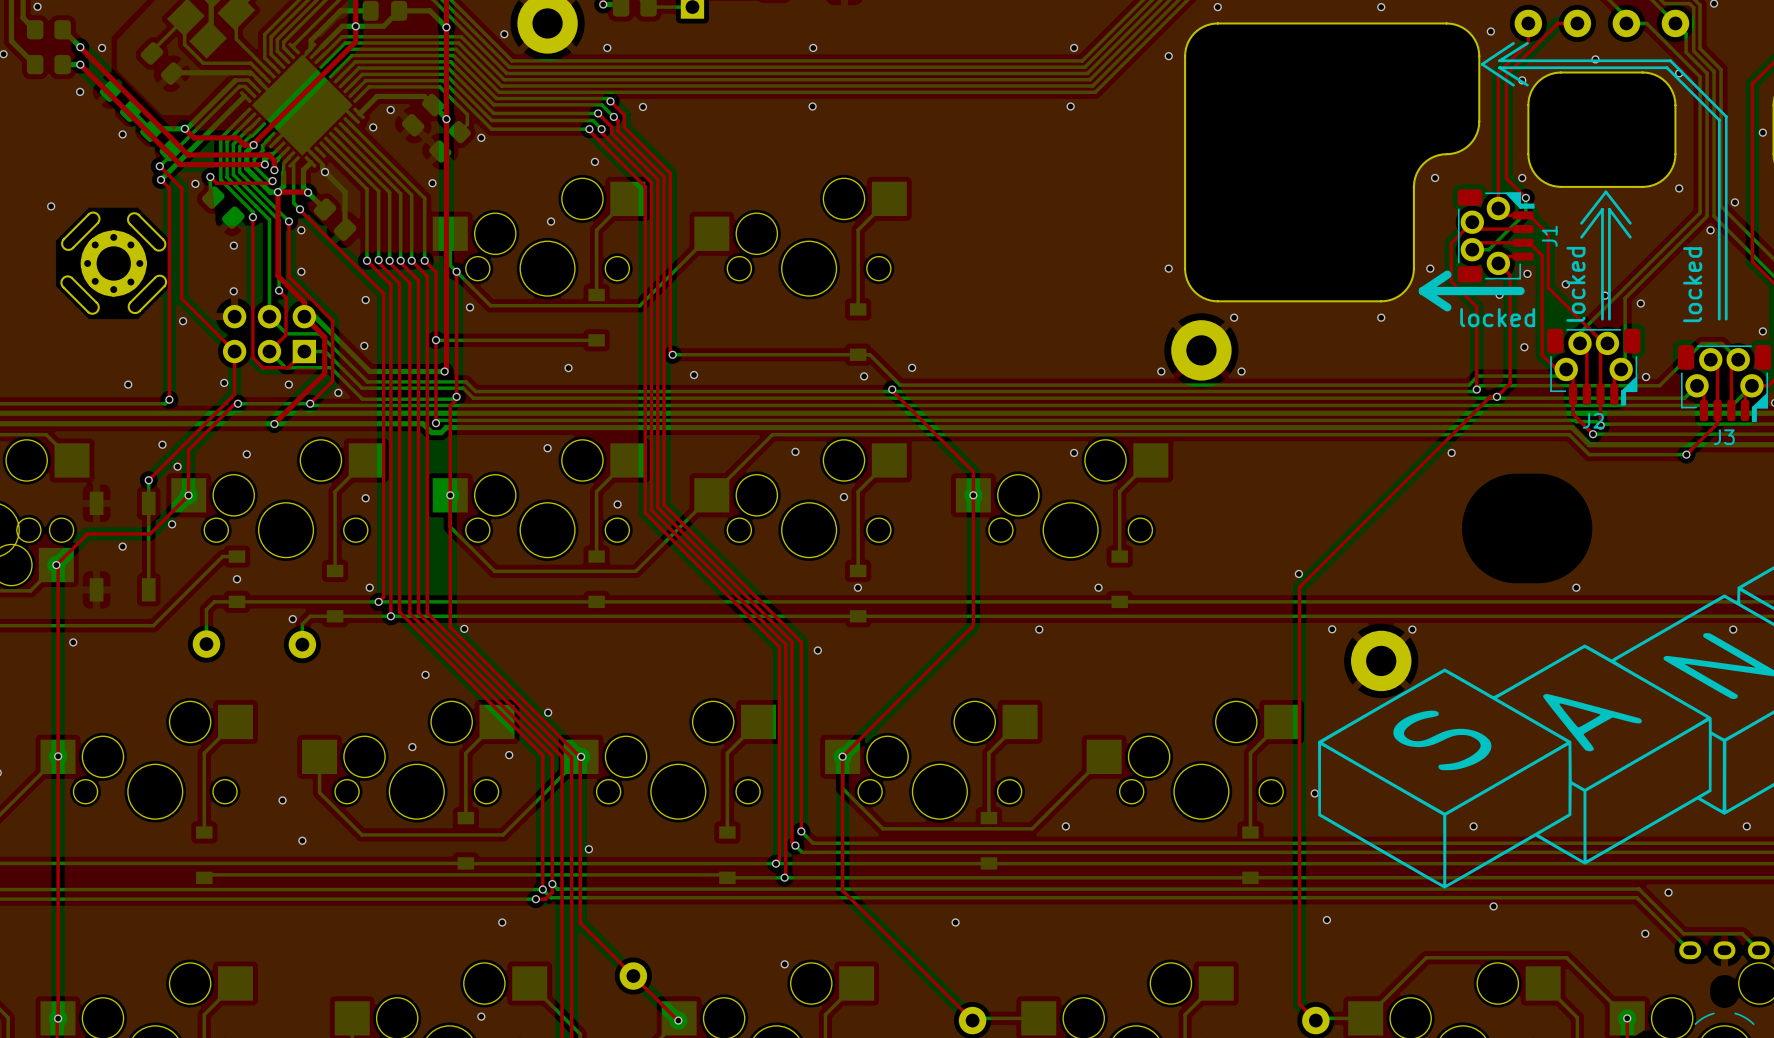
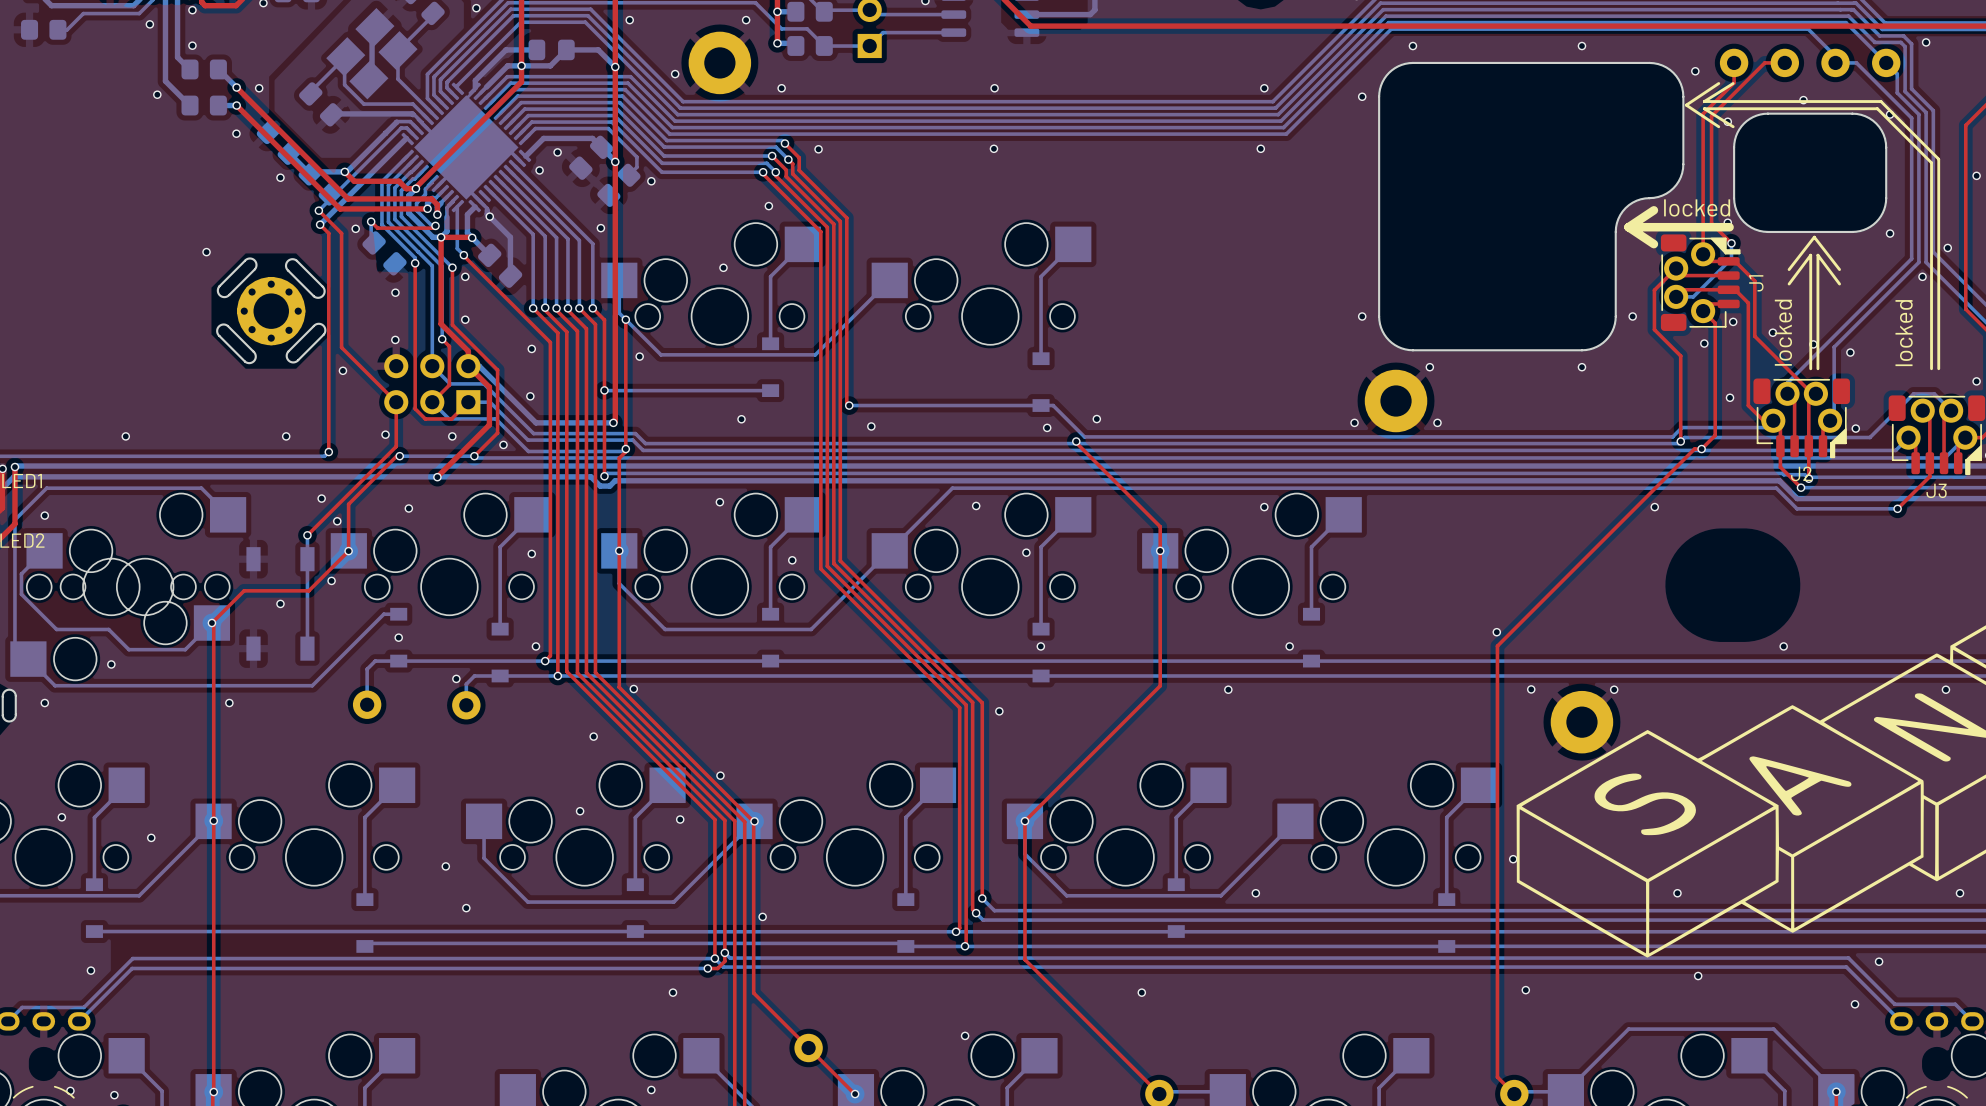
line: (1447, 274) (1422, 291) -> (1653, 210) (1628, 227)
line: (1422, 291) (1520, 291) -> (1628, 227) (1729, 227)
line: (1422, 291) (1447, 307) -> (1628, 227) (1653, 244)
text position: locked (1497, 317) -> locked (1697, 207)

